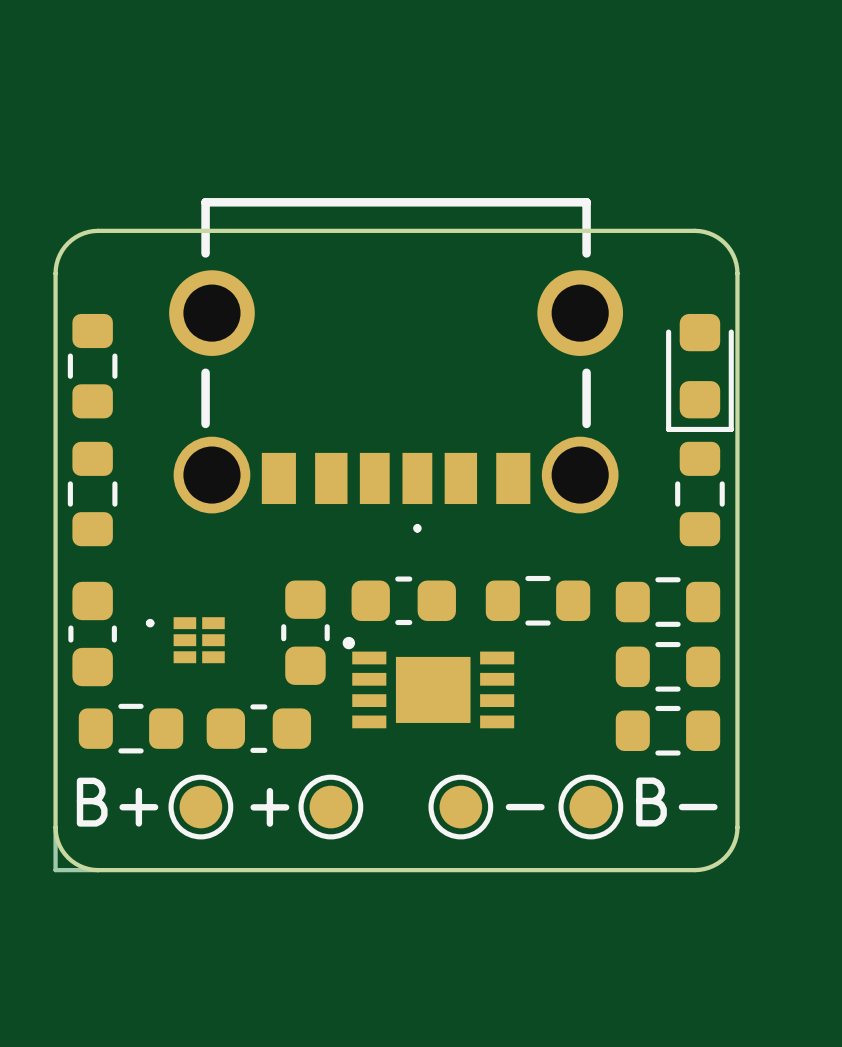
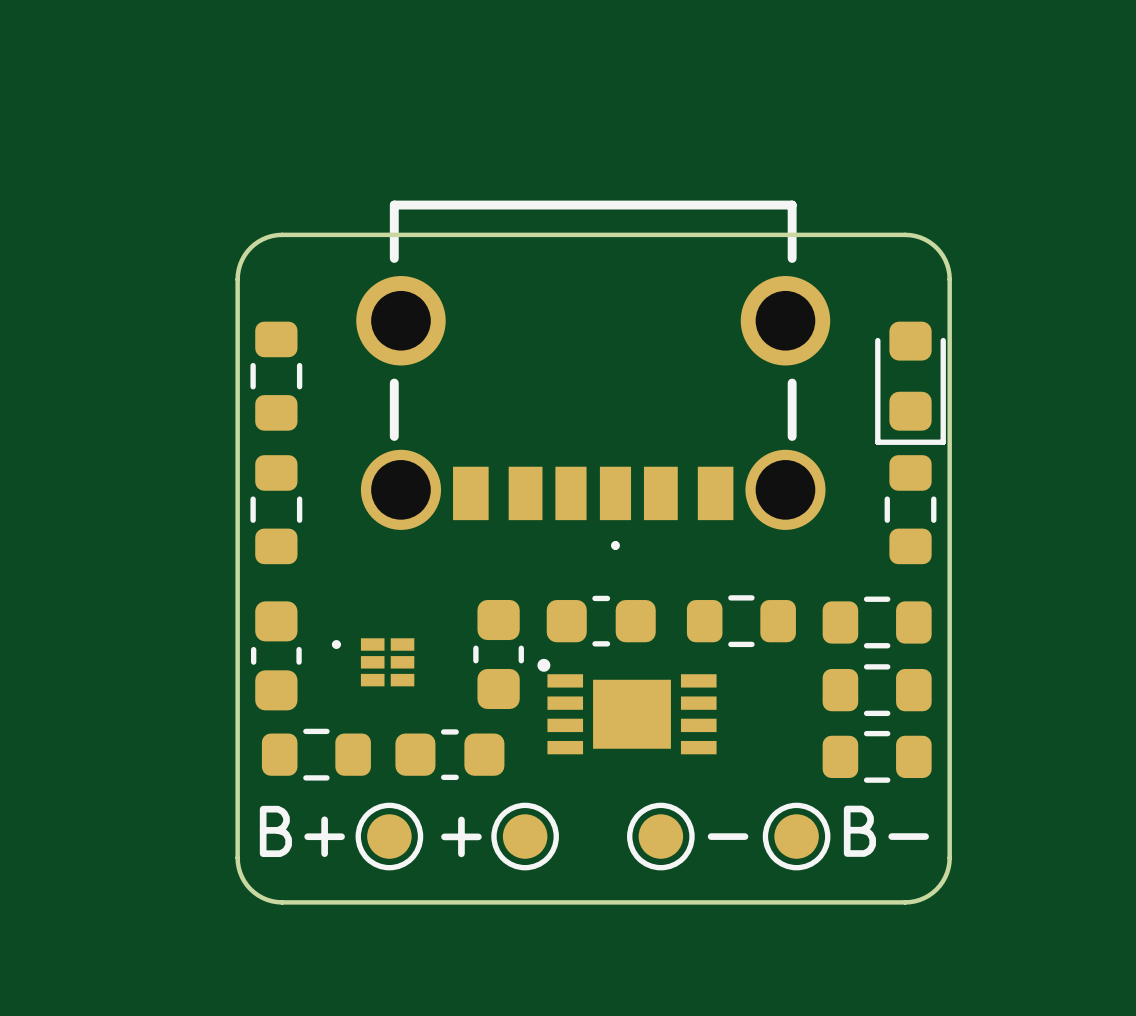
line: (55, 827) (55, 870) (98, 870) -> none

